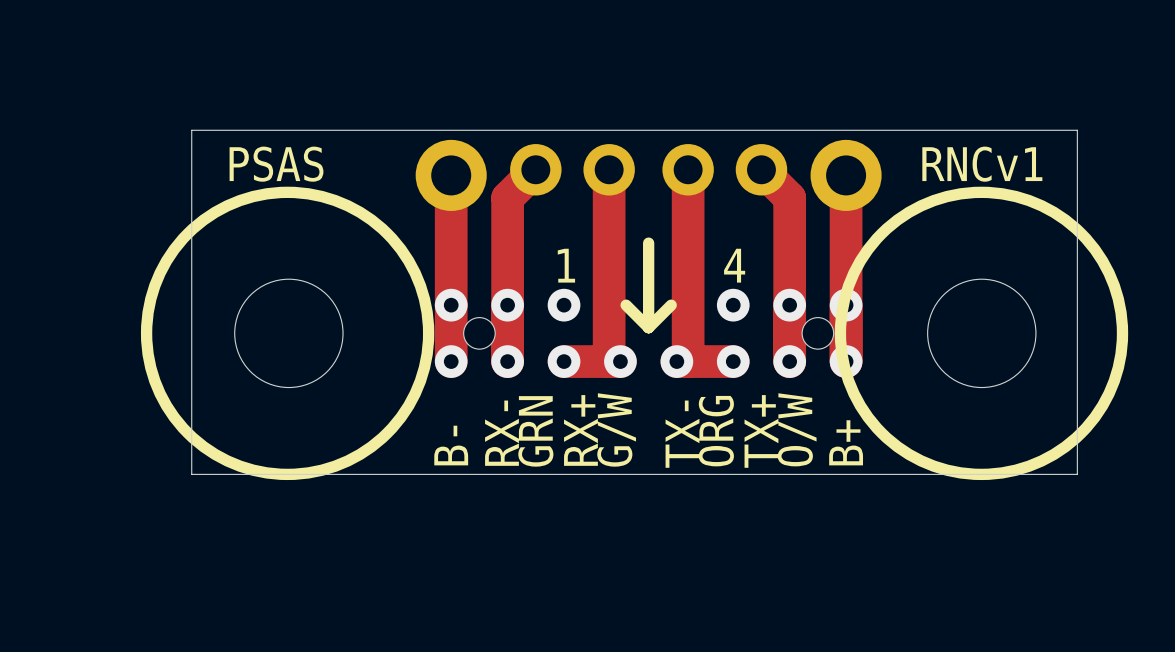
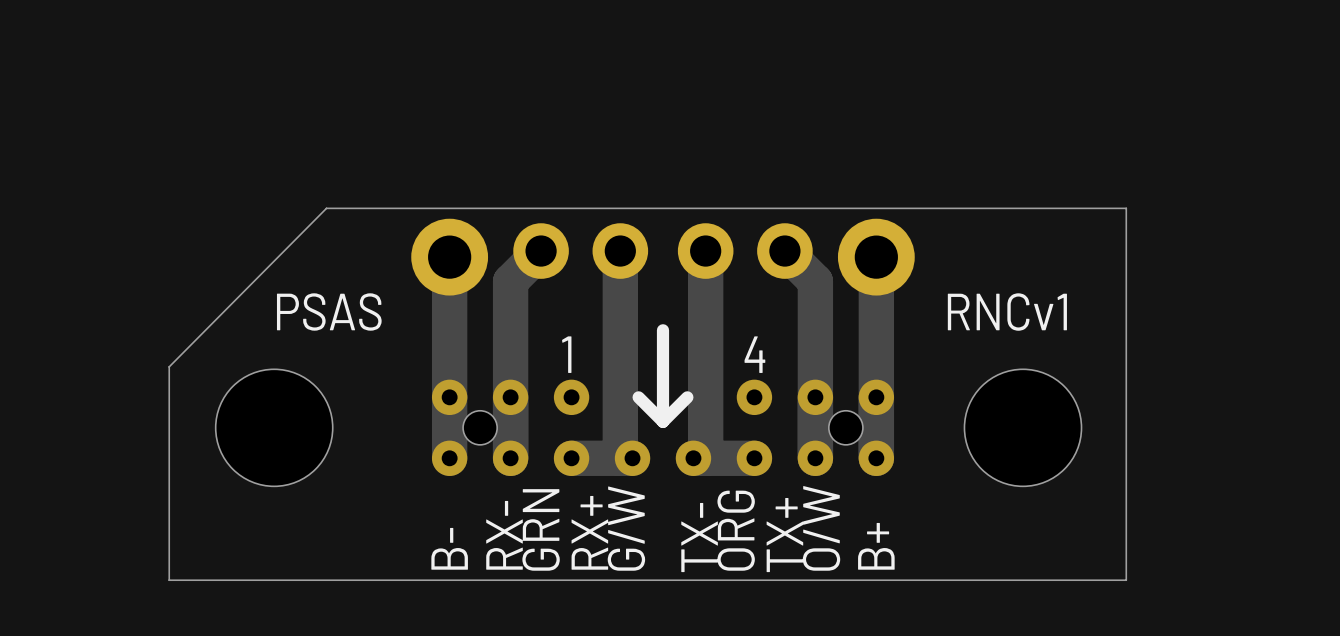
board edge: (337, 130) (191, 130) (191, 276) -> (326, 208) (169, 366)
text position: PSAS (276, 164) -> PSAS (329, 311)
text position: RNCv1 (982, 164) -> RNCv1 (1007, 312)
drawing: [140, 186, 435, 481] -> none
drawing: [834, 186, 1129, 481] -> none

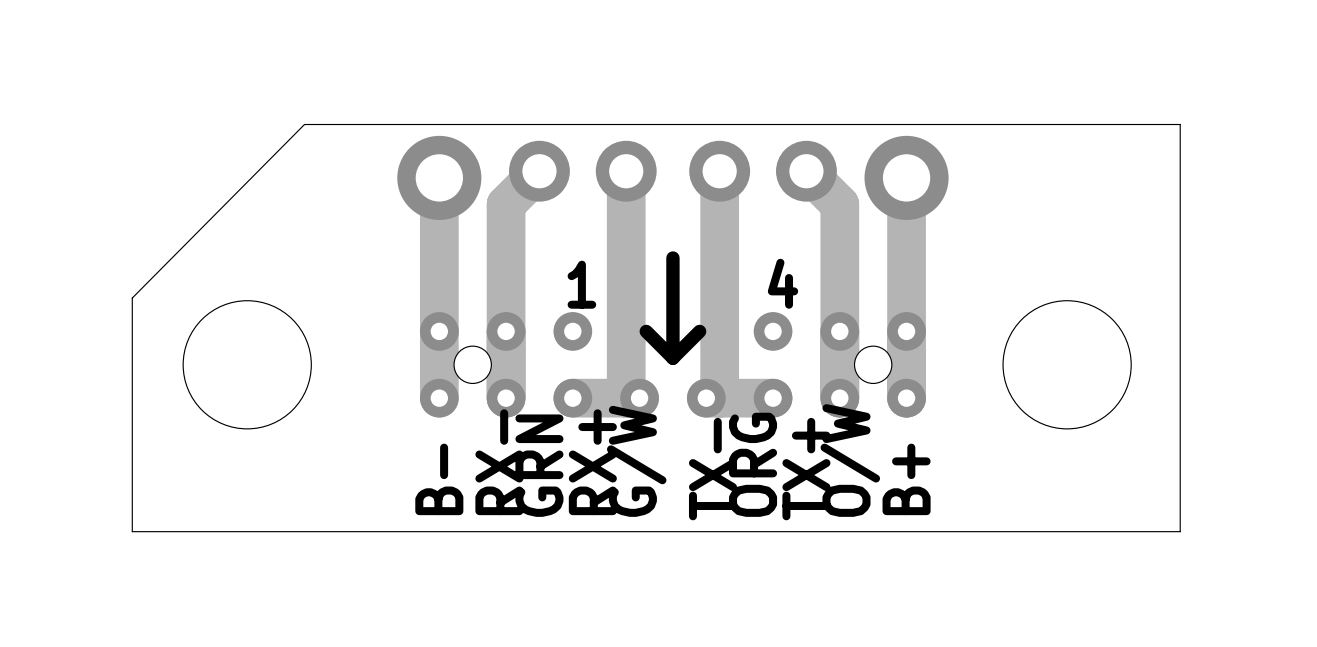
text: PSAS (329, 311) -> none
text: RNCv1 (1007, 312) -> none

